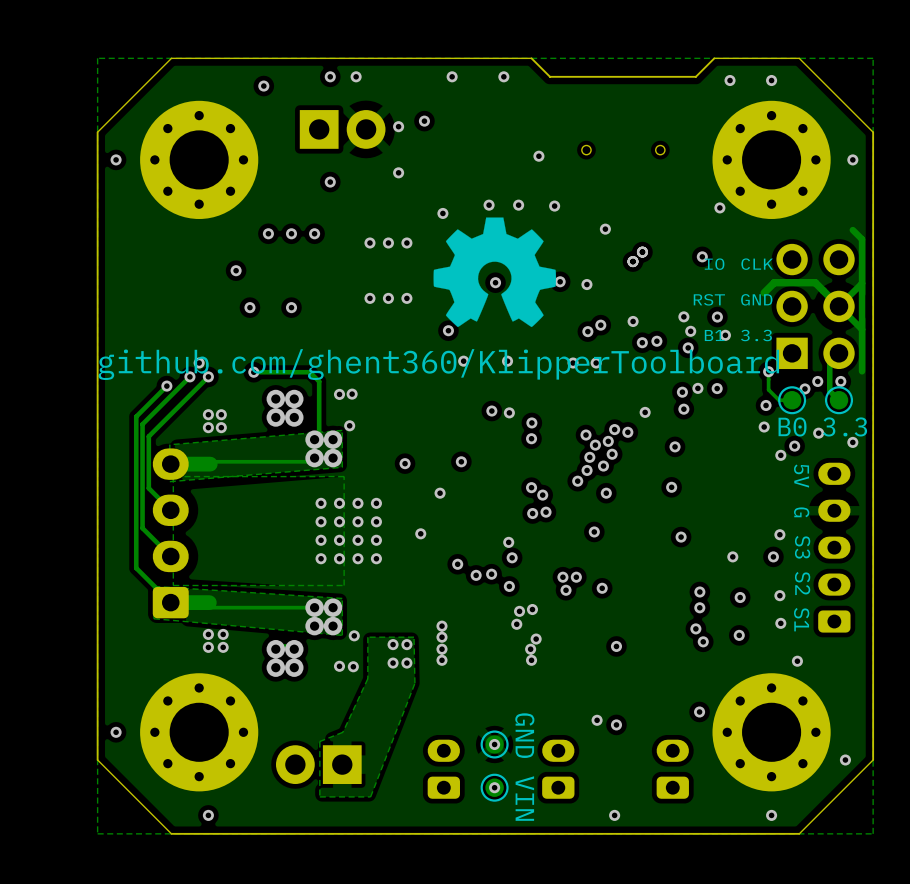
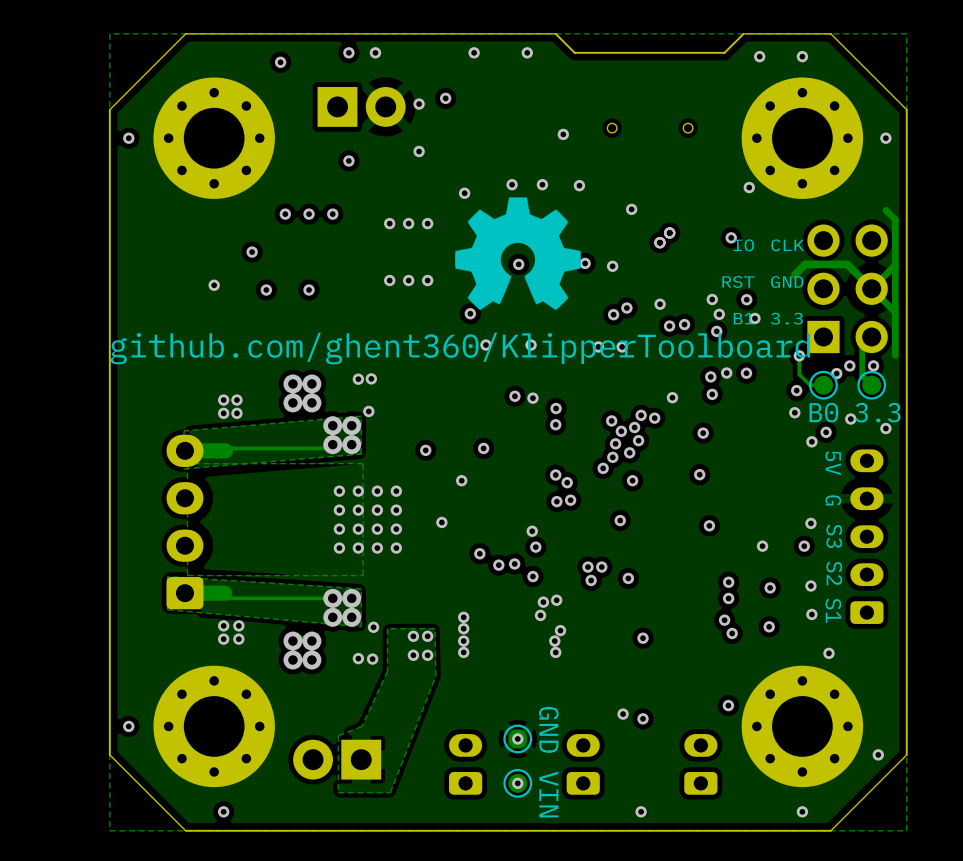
via: none -> (214, 285)
via: (199, 363) -> none
track: (253, 372) (309, 372) (319, 381) (319, 435) (314, 439) -> none
via: (253, 372) -> none
track: (189, 376) (142, 424) (142, 528) (170, 556) -> none
via: (189, 376) -> none
track: (208, 376) (148, 436) (148, 488) (170, 510) -> none
via: (208, 376) -> none
track: (166, 386) (136, 416) (136, 568) (170, 602) -> none
via: (166, 386) -> none

